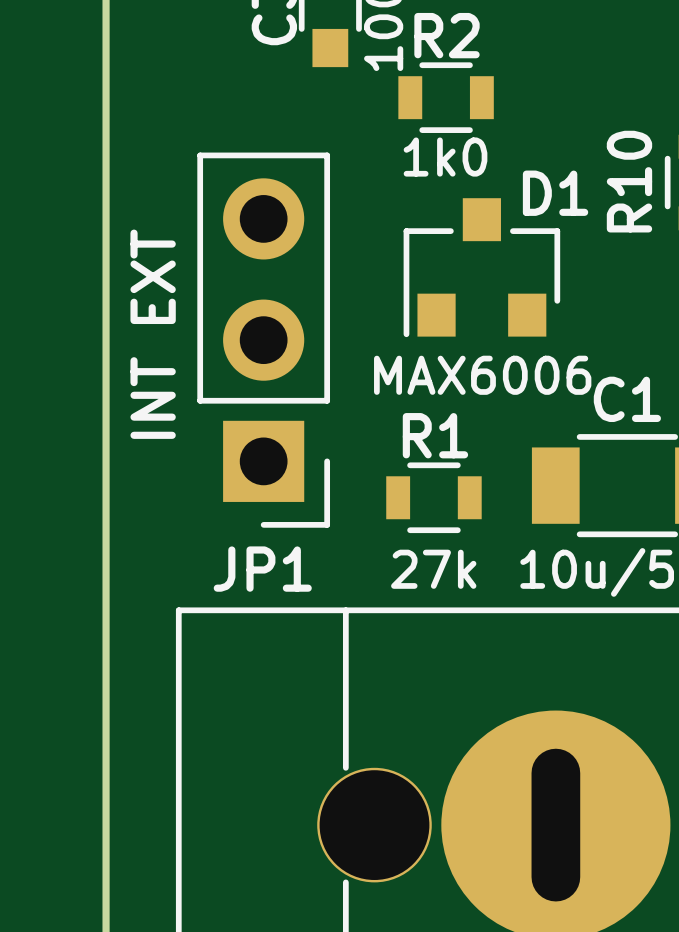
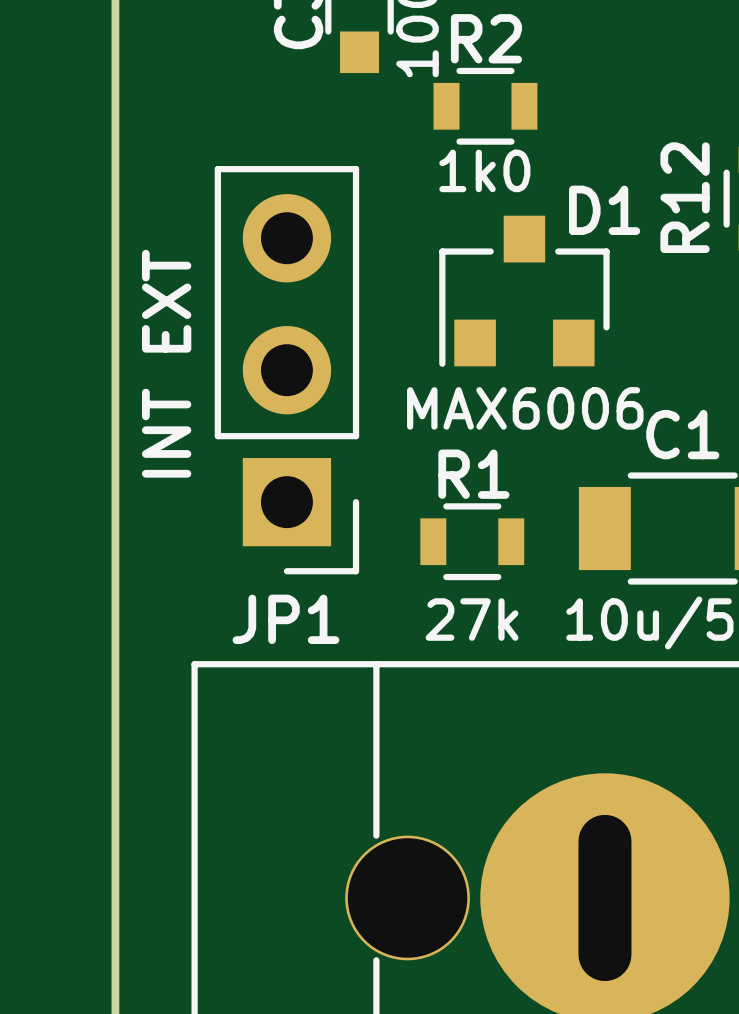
R10 name: R10 (629, 181) -> R12 (685, 197)

